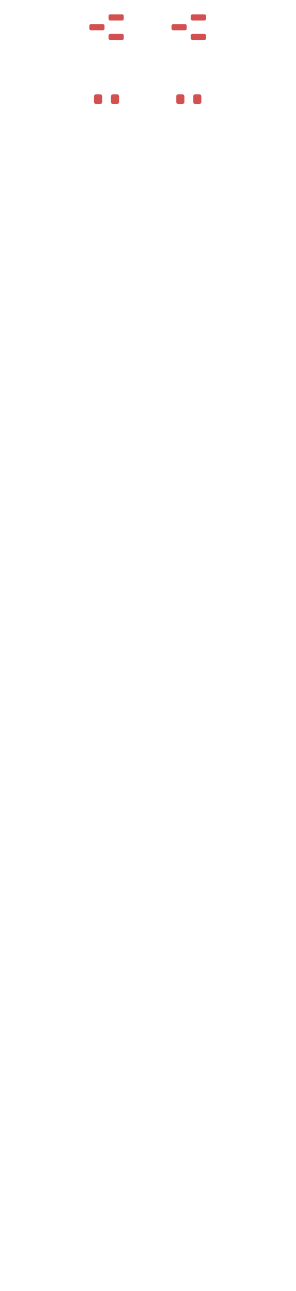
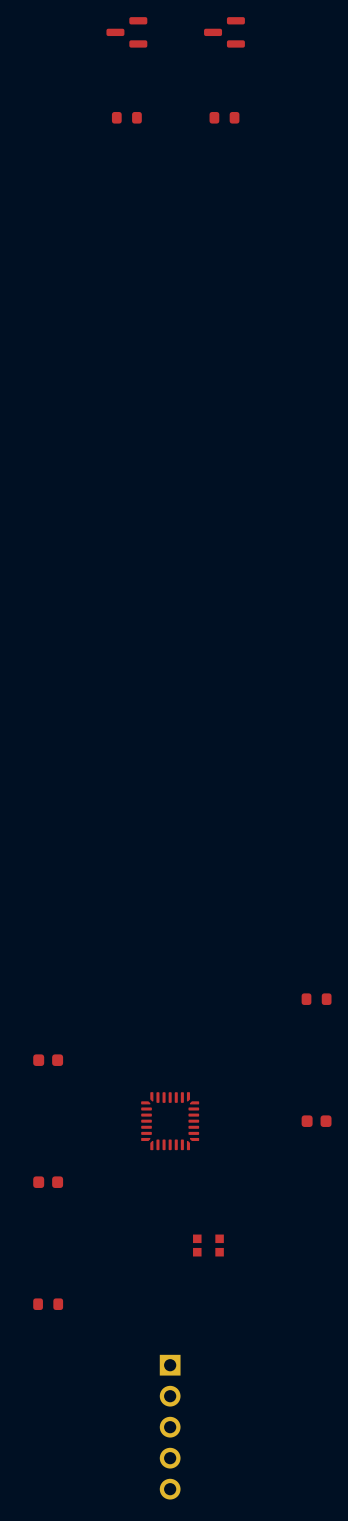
part: none -> (316, 999)
part: none -> (48, 1060)
part: none -> (170, 1121)
part: none -> (316, 1121)
part: none -> (48, 1182)
part: none -> (208, 1245)
part: none -> (48, 1304)
part: none -> (170, 1427)

